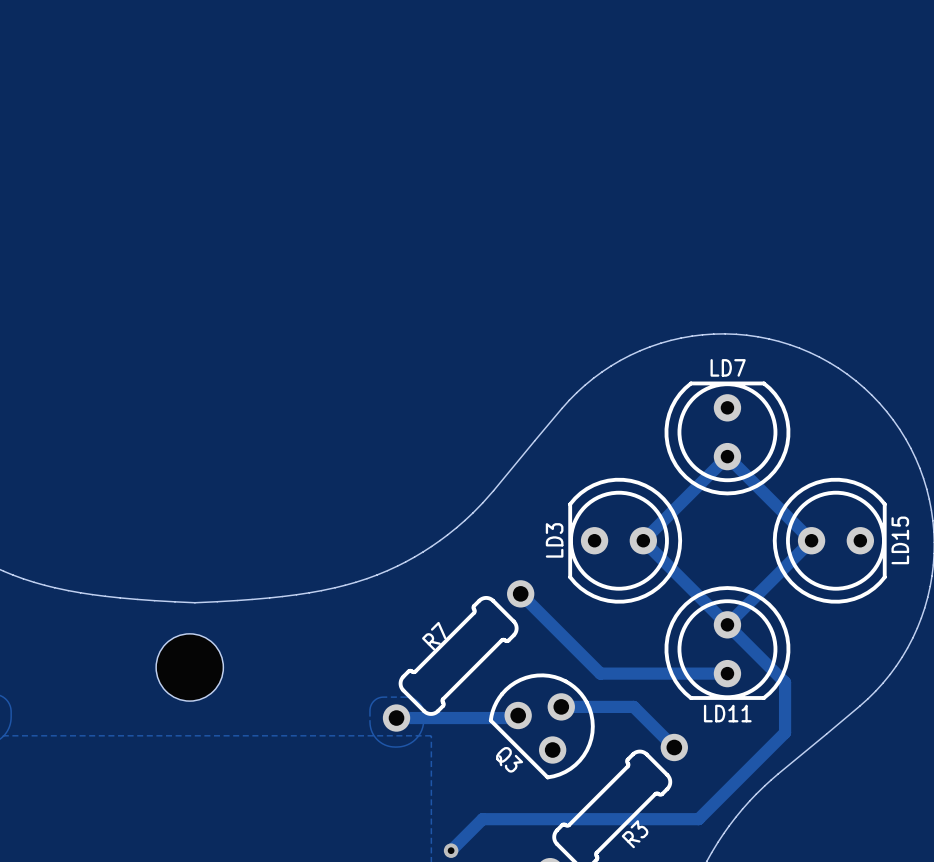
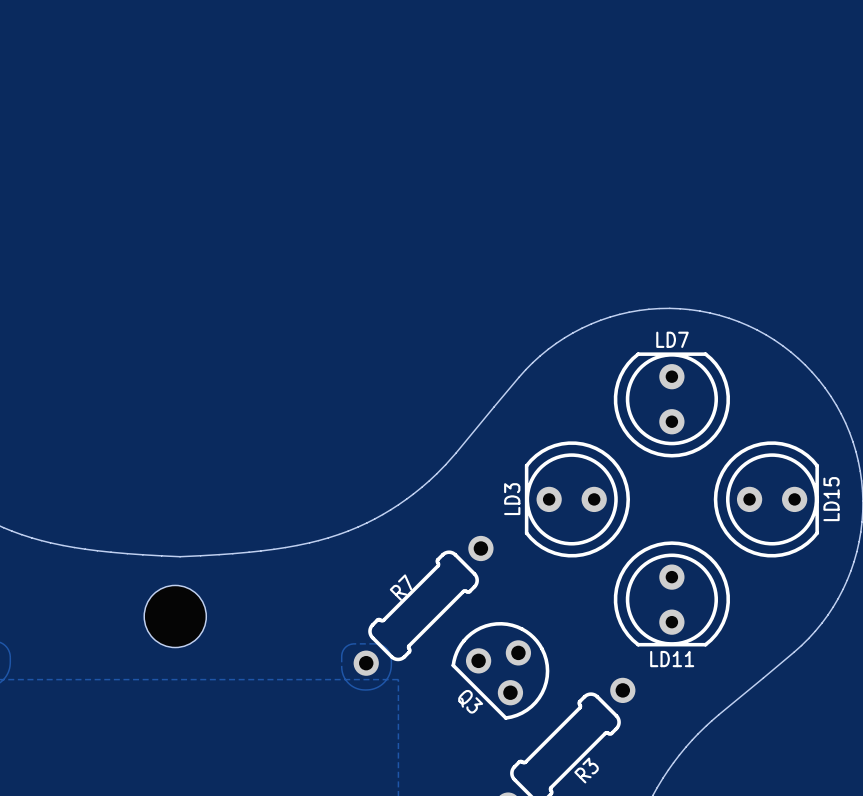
track: (520, 593) (600, 673) (727, 673) -> none
track: (727, 624) (811, 540) (727, 456) (643, 540) (785, 682) (785, 732) (698, 819) (482, 819) (451, 850) -> none
track: (561, 706) (633, 706) (674, 747) -> none
track: (518, 715) (515, 718) (396, 718) -> none
via: (451, 850) -> none

